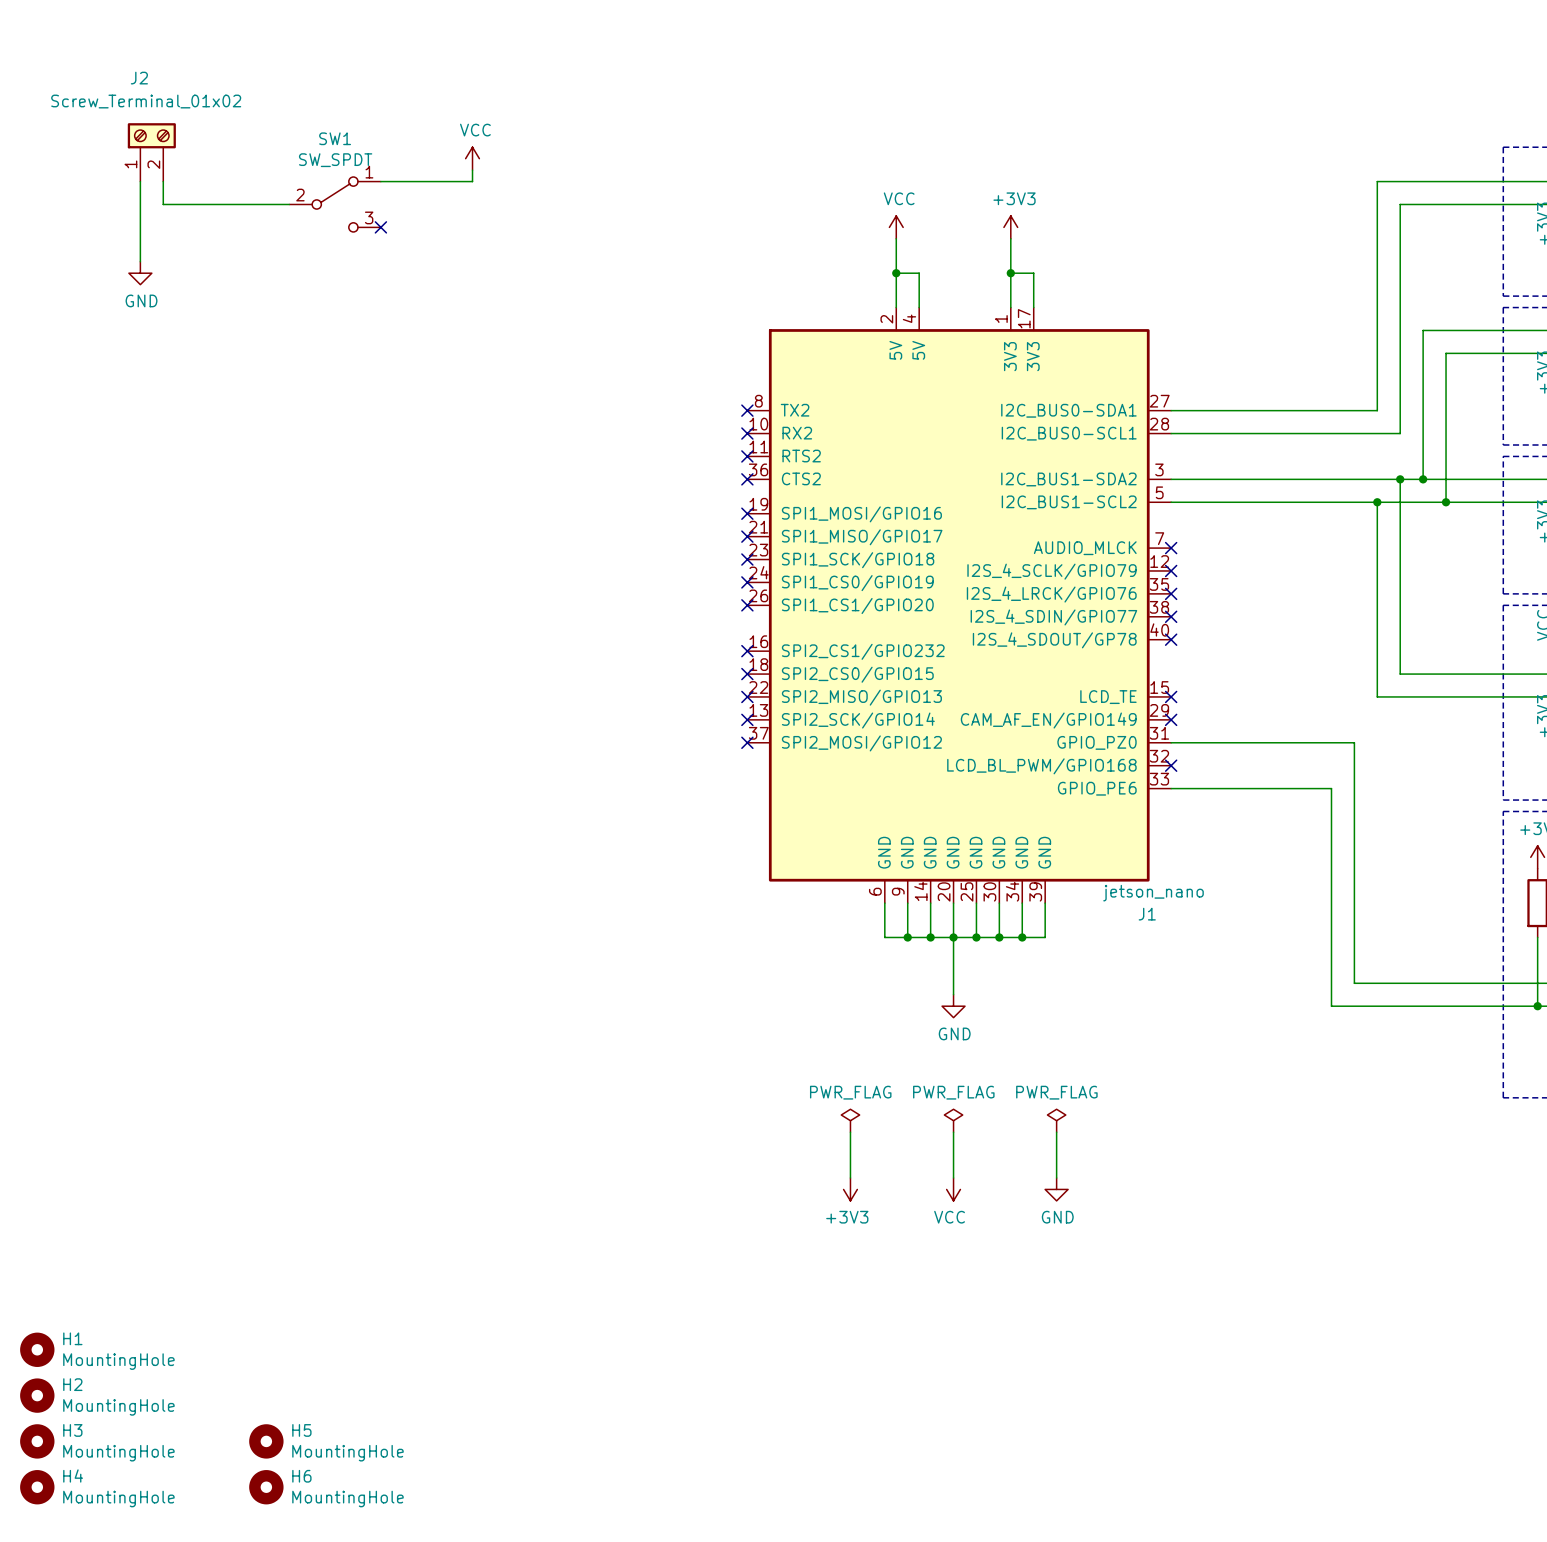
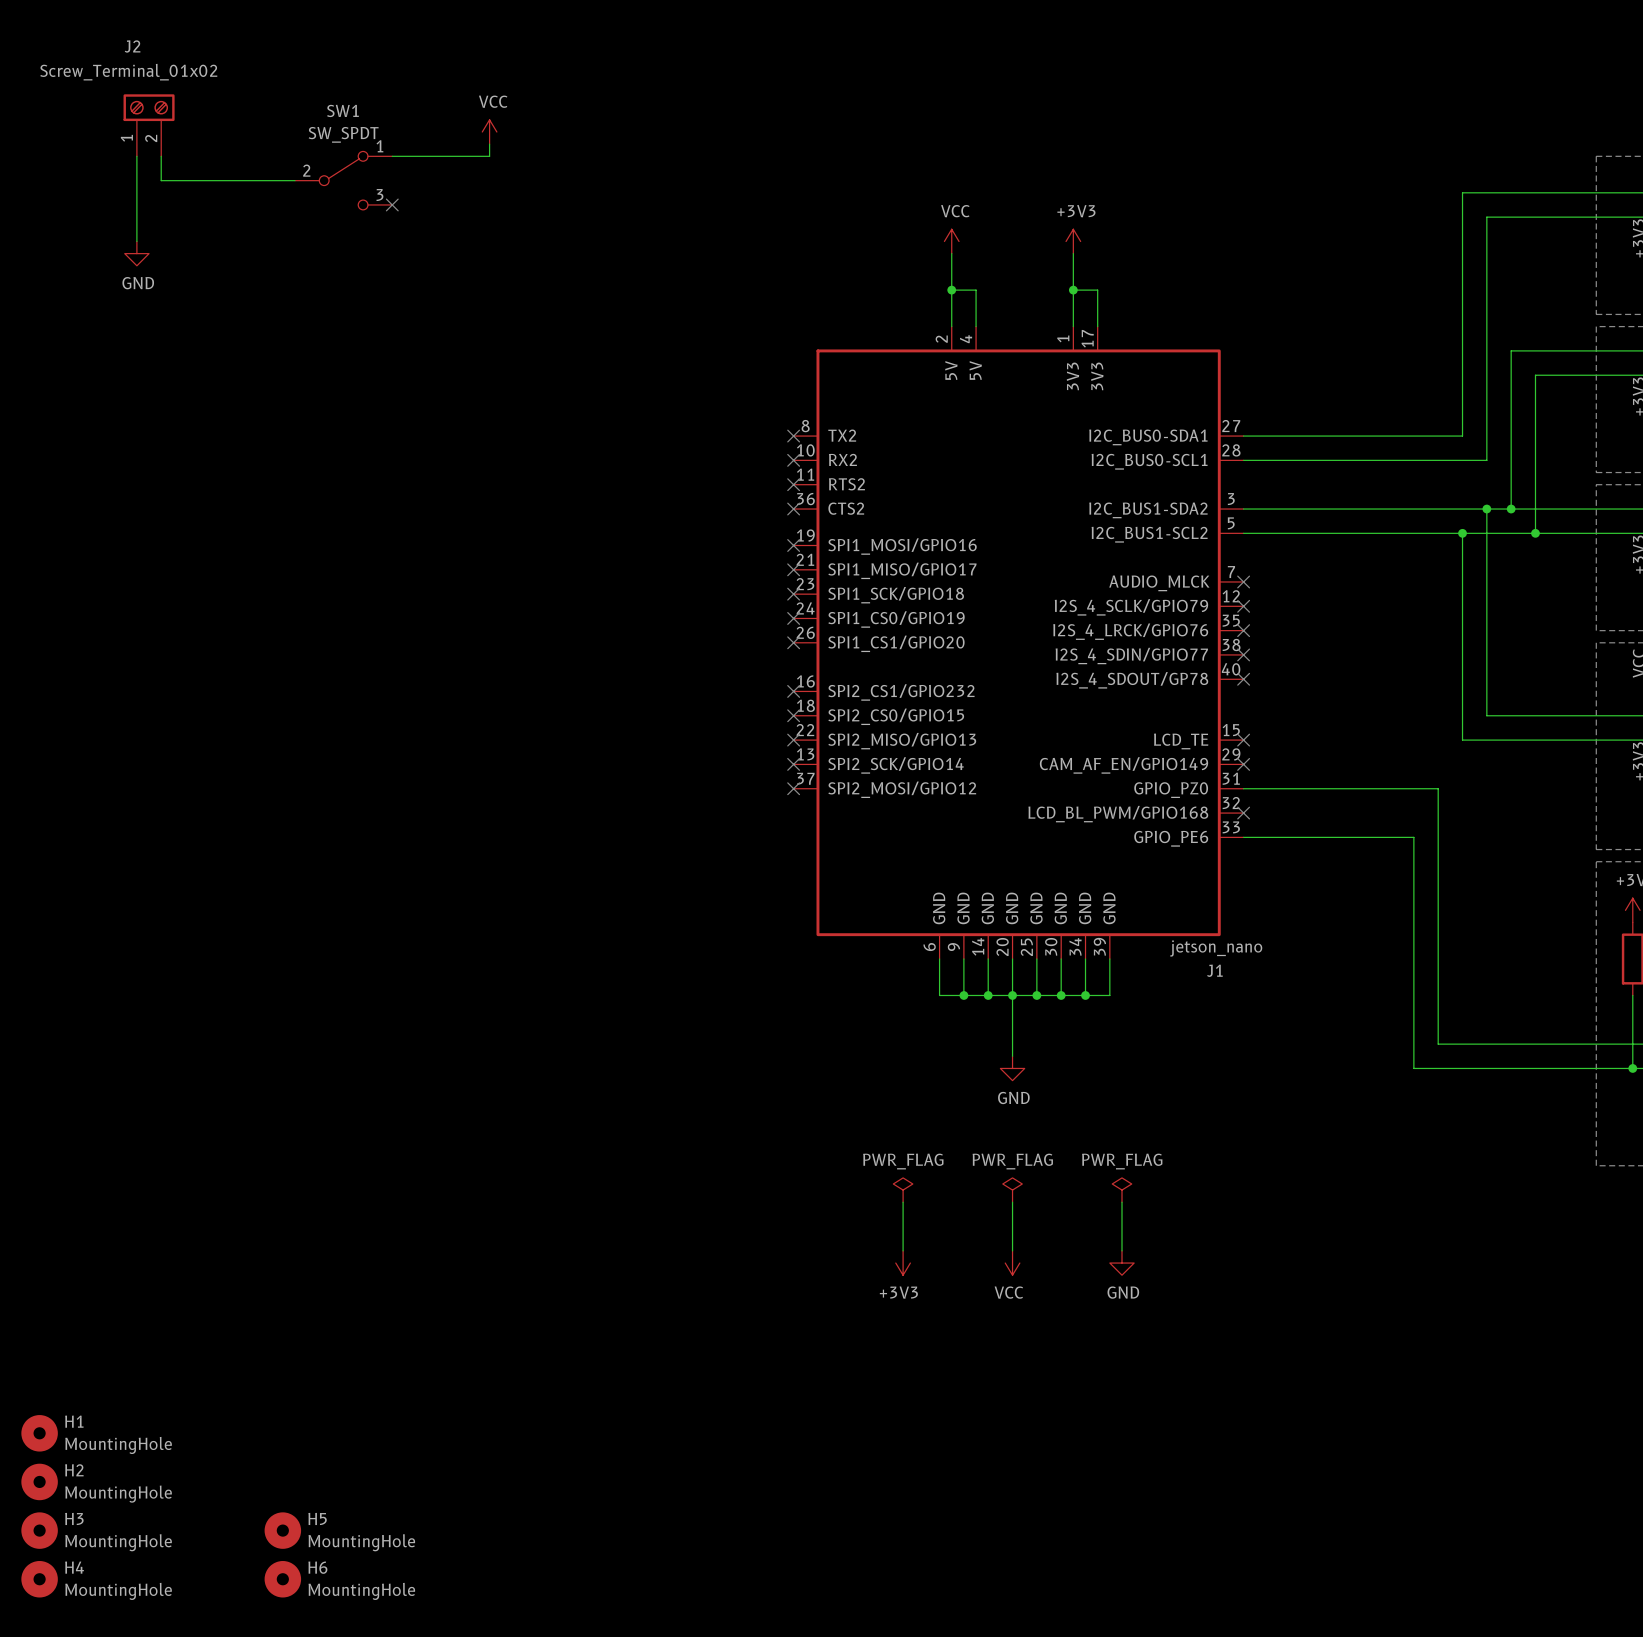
J2 position: (151, 152) -> (149, 125)
power symbol position: VCC (472, 158) -> VCC (489, 132)
wire: (472, 170) (472, 181) (380, 181) -> (489, 144) (489, 156) (392, 156)
wire: (140, 181) (140, 261) -> (136, 156) (136, 241)
wire: (163, 181) (163, 204) (289, 204) -> (161, 156) (161, 180) (295, 180)
SW1 position: (335, 204) -> (343, 180)
no-connect mark position: (380, 227) -> (392, 204)
power symbol position: GND (140, 273) -> GND (136, 253)

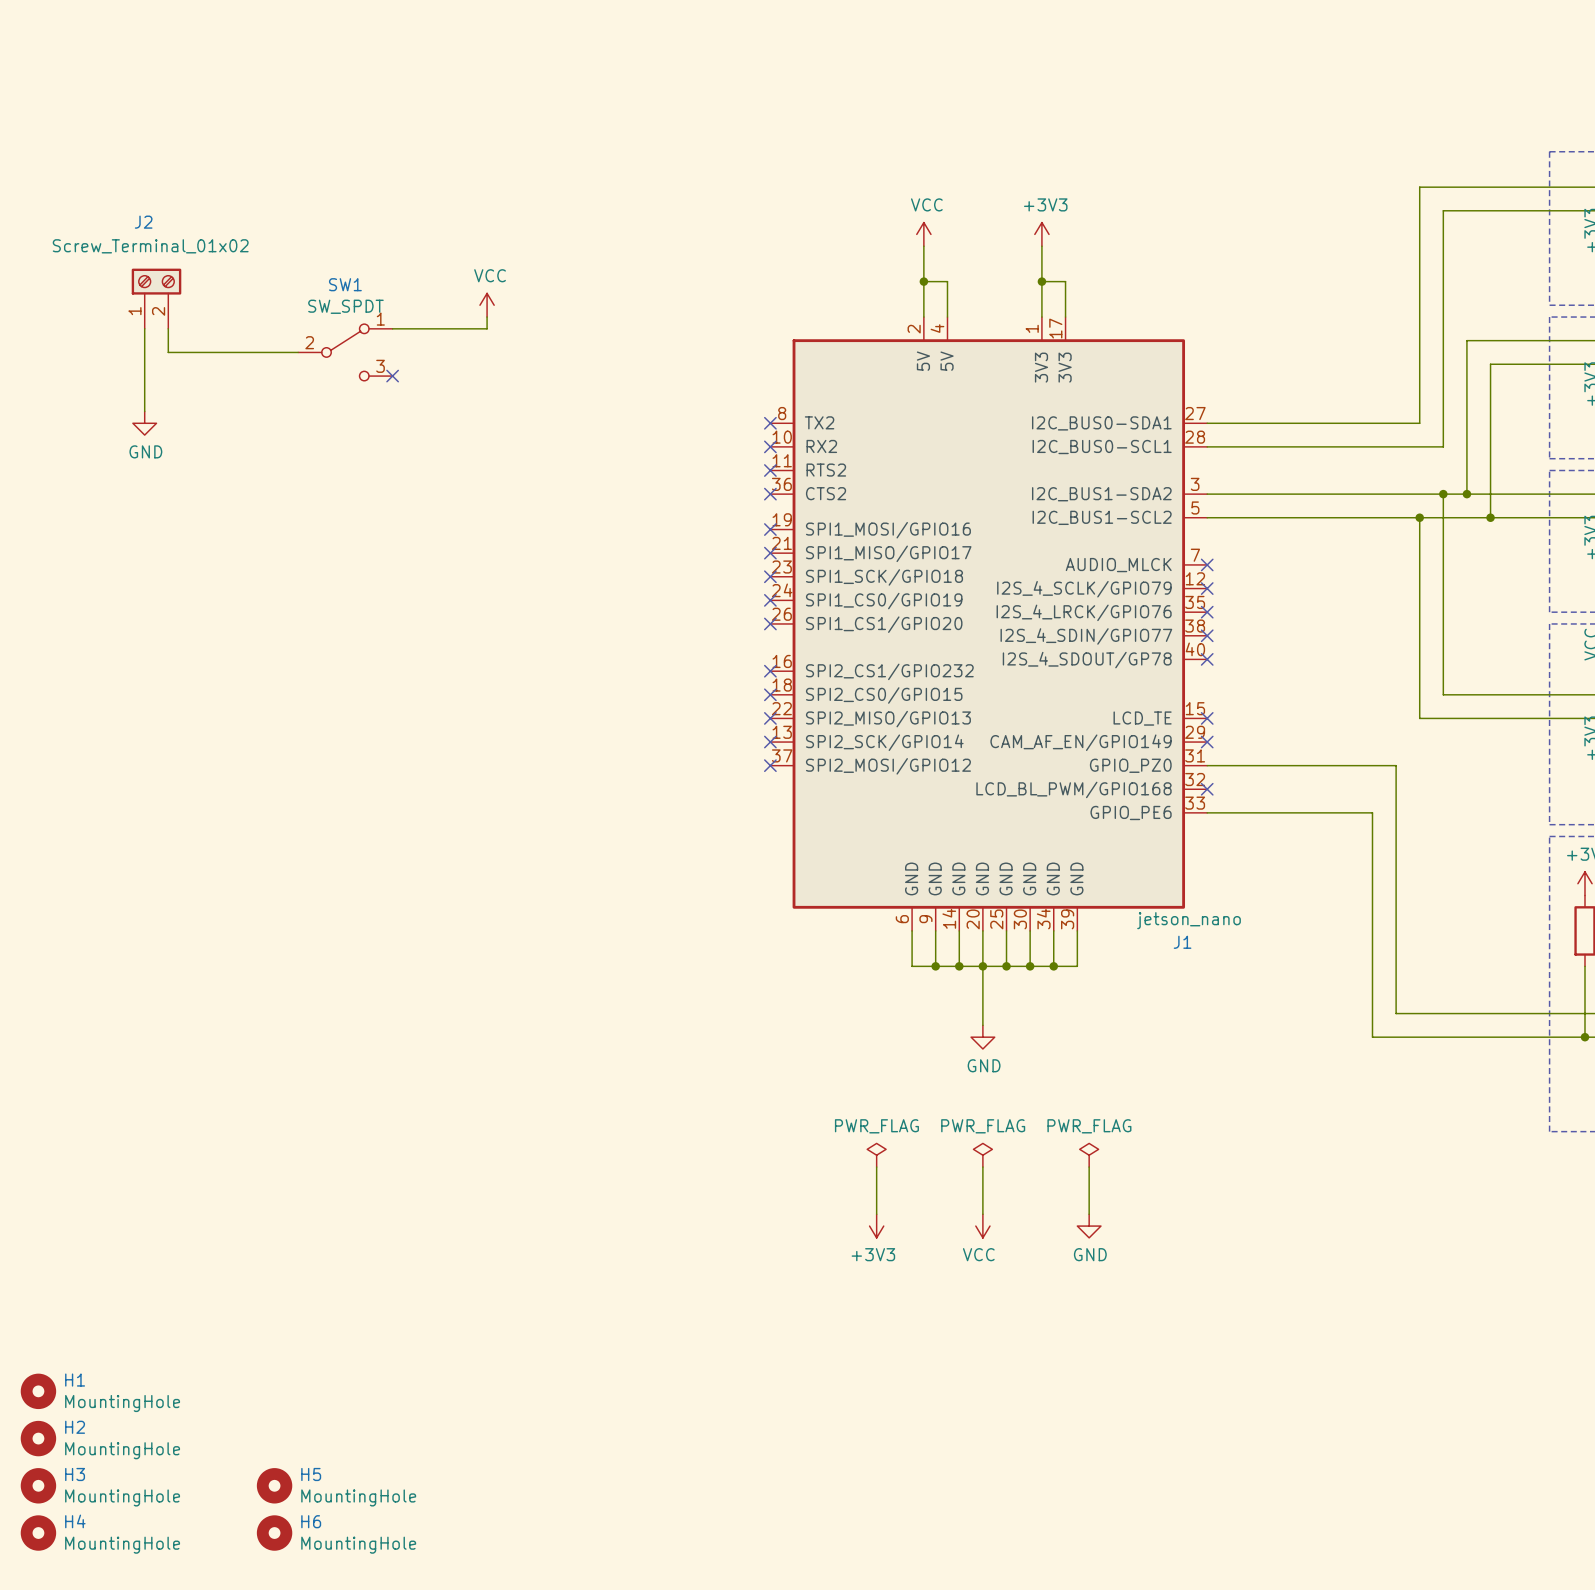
J2 position: (149, 125) -> (156, 298)
power symbol position: VCC (489, 132) -> VCC (487, 305)
wire: (489, 144) (489, 156) (392, 156) -> (487, 317) (487, 328) (392, 328)
wire: (136, 156) (136, 241) -> (144, 328) (144, 411)
wire: (161, 156) (161, 180) (295, 180) -> (168, 328) (168, 352) (298, 352)
SW1 position: (343, 180) -> (345, 352)
no-connect mark: (392, 204) -> none
power symbol position: GND (136, 253) -> GND (144, 423)
no-connect mark: none -> (392, 376)

